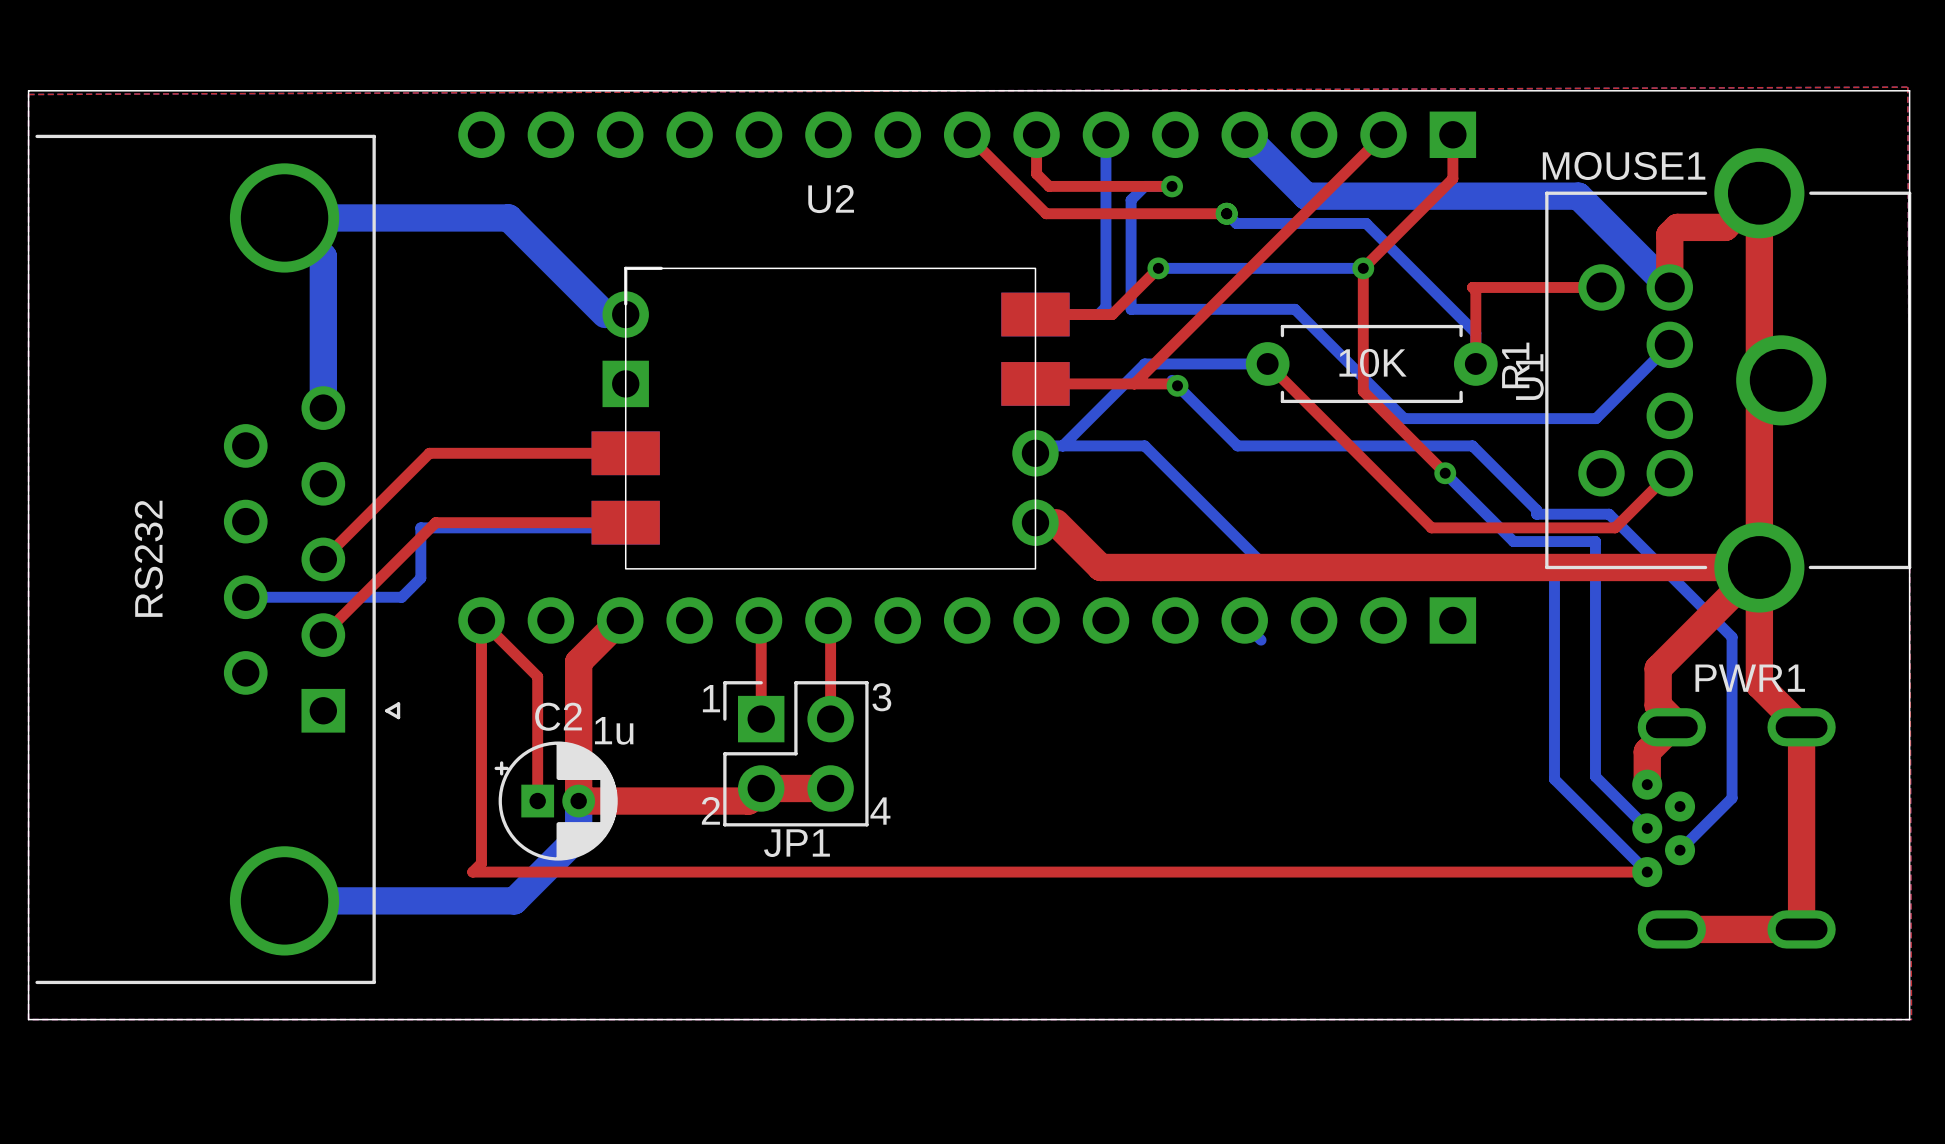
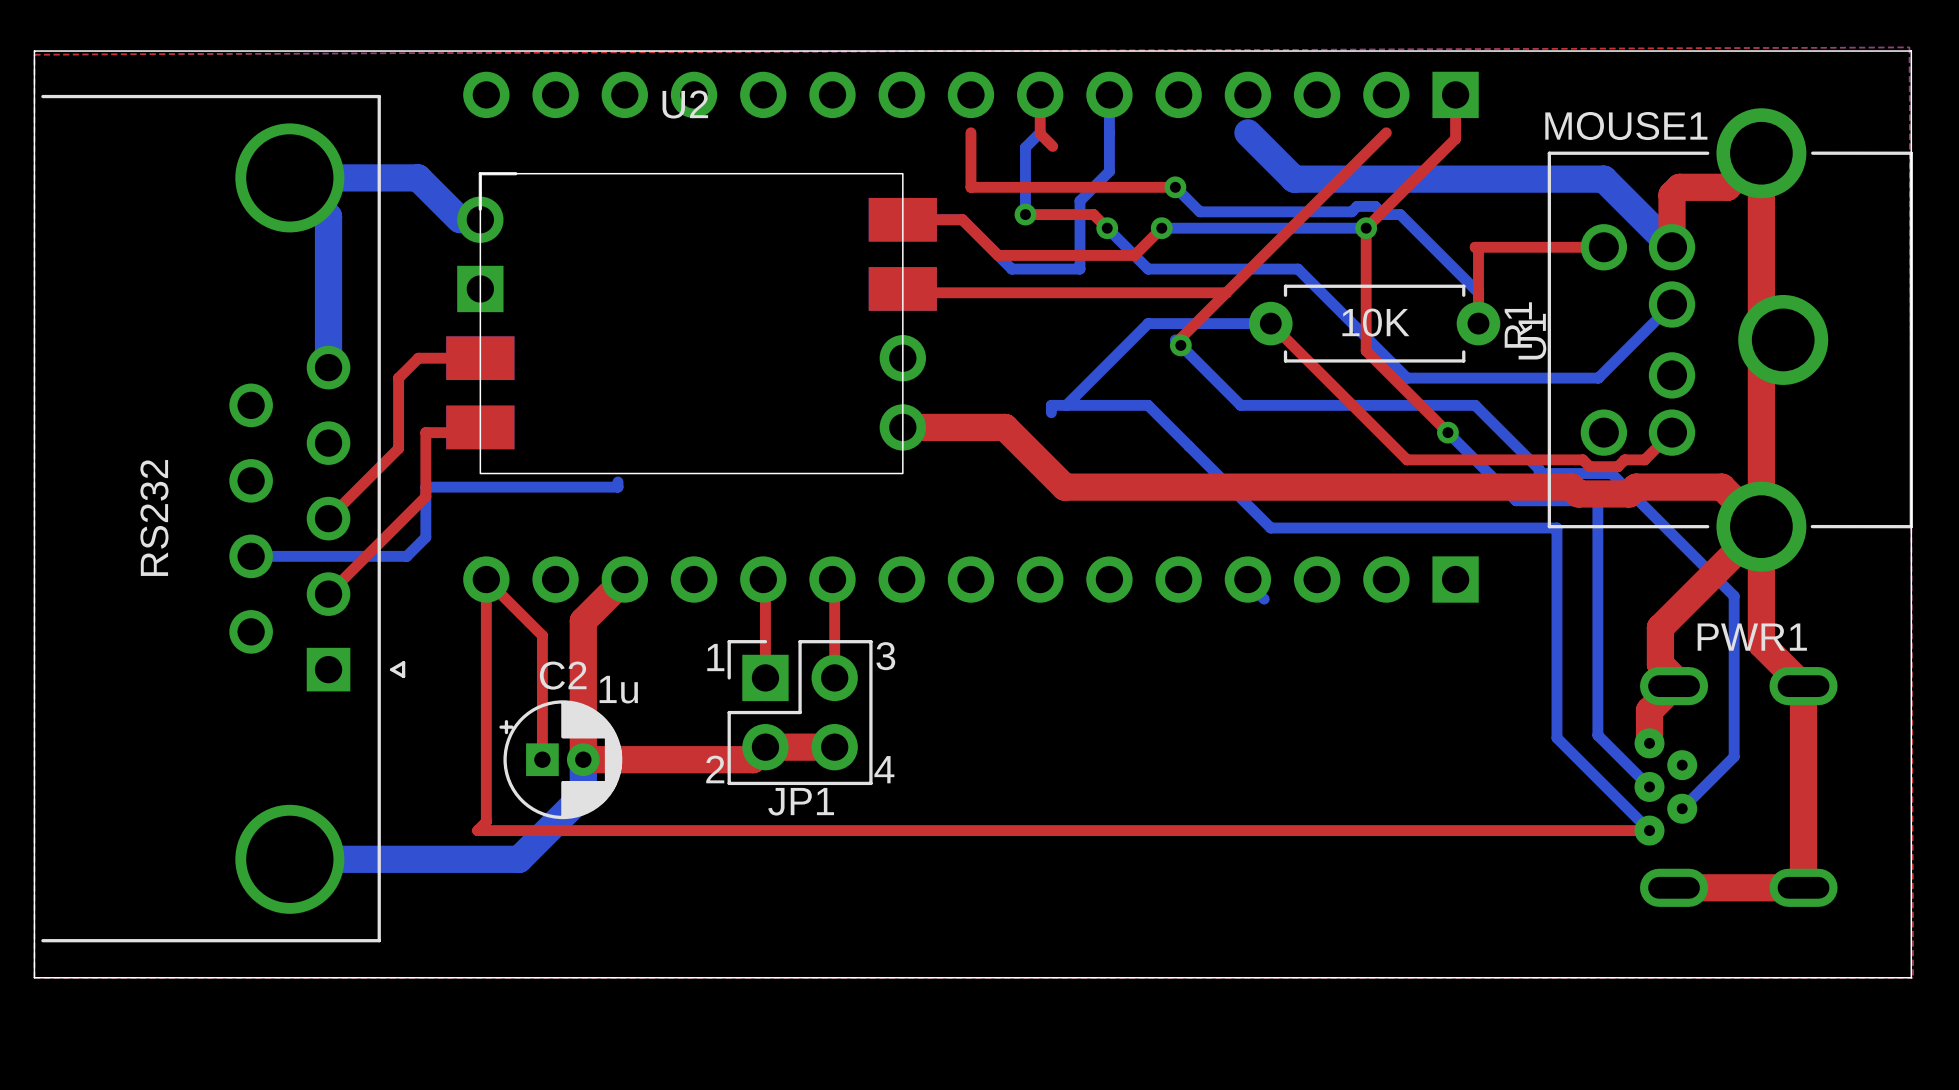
top track: (967, 134) (1046, 213) (1226, 213) -> none
bottom track: (1244, 134) (1306, 196) (1578, 196) (1601, 219) -> (1247, 132) (1294, 179) (1603, 179)
top track: (1383, 134) (1134, 383) -> none
top track: none -> (970, 132) (970, 187) (1175, 187)
bottom track: none -> (1040, 132) (1025, 147) (1025, 214)
top track: none -> (1386, 132) (1180, 338) (1180, 345)
top track: (1049, 186) (1172, 186) -> none
bottom track: (1172, 186) (1144, 186) (1131, 200) (1131, 309) (1144, 309) -> (1107, 228) (1148, 269)
via: (1172, 186) -> none
bottom track: (1105, 211) (1105, 307) (1098, 314) (1047, 314) -> (1109, 171) (1079, 200) (1079, 269) (1011, 269) (962, 219) (915, 219)
bottom track: (1226, 213) (1236, 223) (1366, 223) (1397, 254) -> (1175, 187) (1199, 211) (1351, 211) (1357, 206) (1375, 206) (1383, 214) (1400, 214)
via: (1226, 213) -> none
bottom track: (413, 217) (508, 217) (605, 314) -> (418, 177) (459, 219)
via: none -> (1175, 187)
top track: none -> (1025, 214) (1093, 214) (1107, 228)
via: none -> (1025, 214)
U2 footprint: [591, 266, 1070, 570] -> [446, 172, 937, 475]
via: none -> (1107, 228)
top track: (1131, 295) (1112, 314) (1047, 314) -> (1134, 255) (998, 255) (962, 219) (915, 219)
top track: none -> (915, 288) (918, 292) (1226, 292)
top track: (1047, 383) (1175, 383) -> none
top track: (613, 453) (429, 453) (393, 489) -> (468, 358) (418, 358) (398, 378) (398, 448)
top track: none -> (923, 427) (1005, 427) (1059, 481)
top track: (1404, 500) (1431, 527) -> (1407, 459) (1582, 459) (1589, 466) (1617, 466) (1624, 459) (1644, 459)
top track: (1642, 500) (1615, 527) (1569, 527) -> (1761, 526) (1721, 487) (1636, 487) (1629, 493) (1578, 493) (1571, 487)
top track: (613, 522) (435, 522) (420, 537) -> (468, 427) (468, 432) (425, 432) (425, 496)
top track: (1061, 527) (1100, 567) (1759, 567) -> (1064, 487) (1434, 487)
top track width: thin (1431, 527) (1569, 527) -> thick (1434, 487) (1571, 487)

